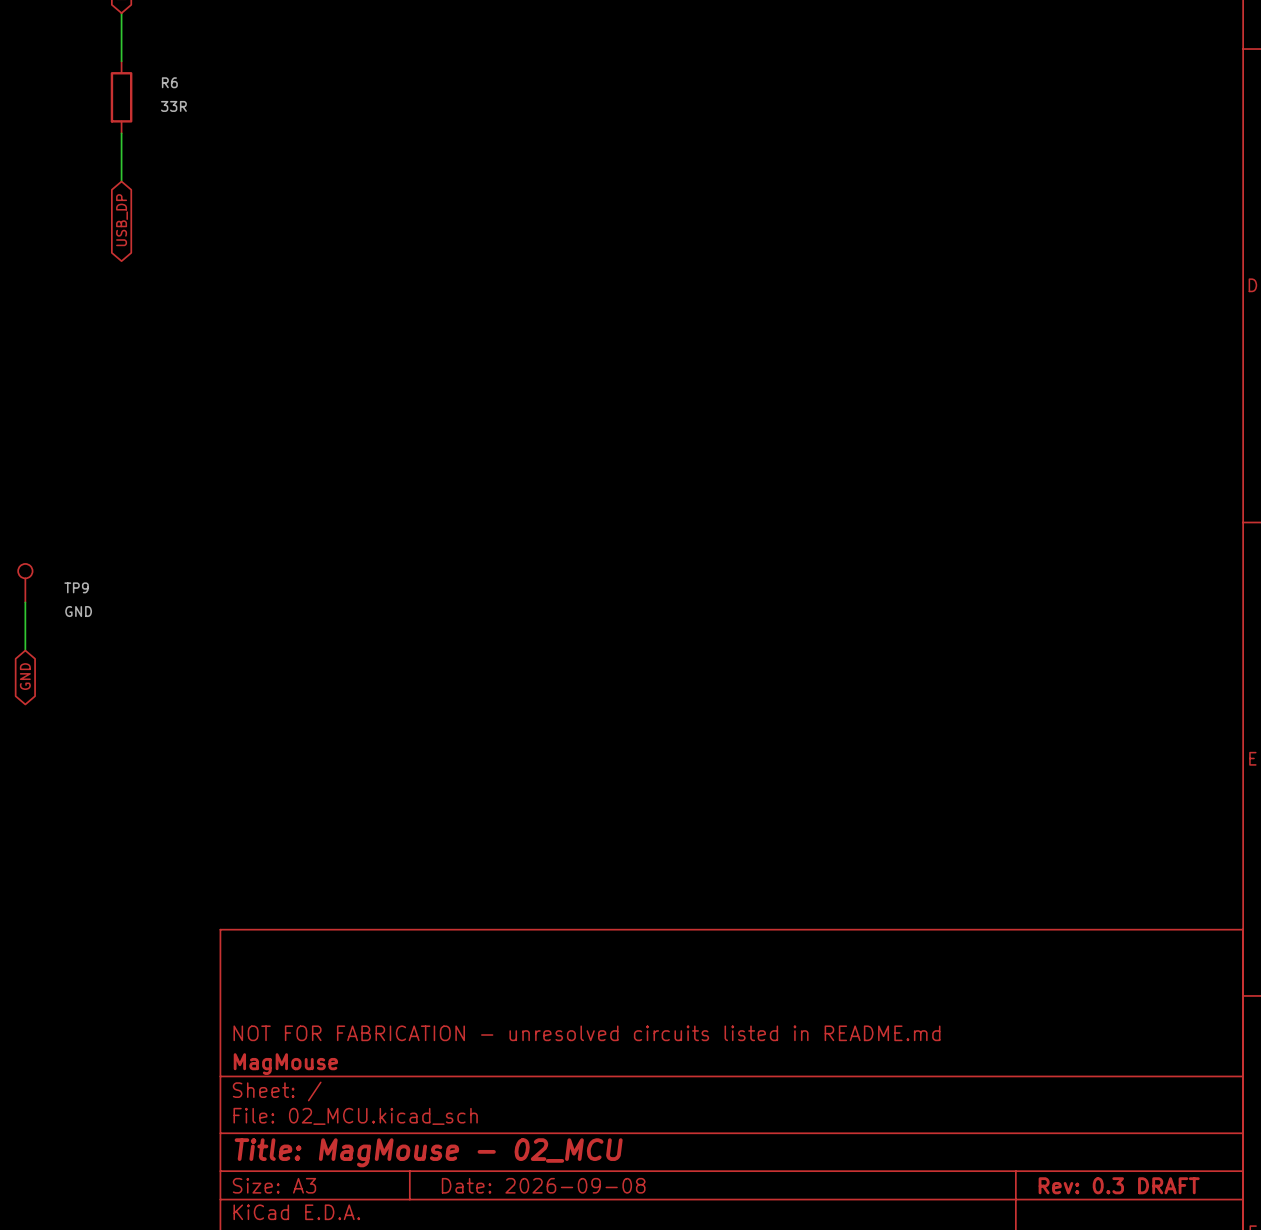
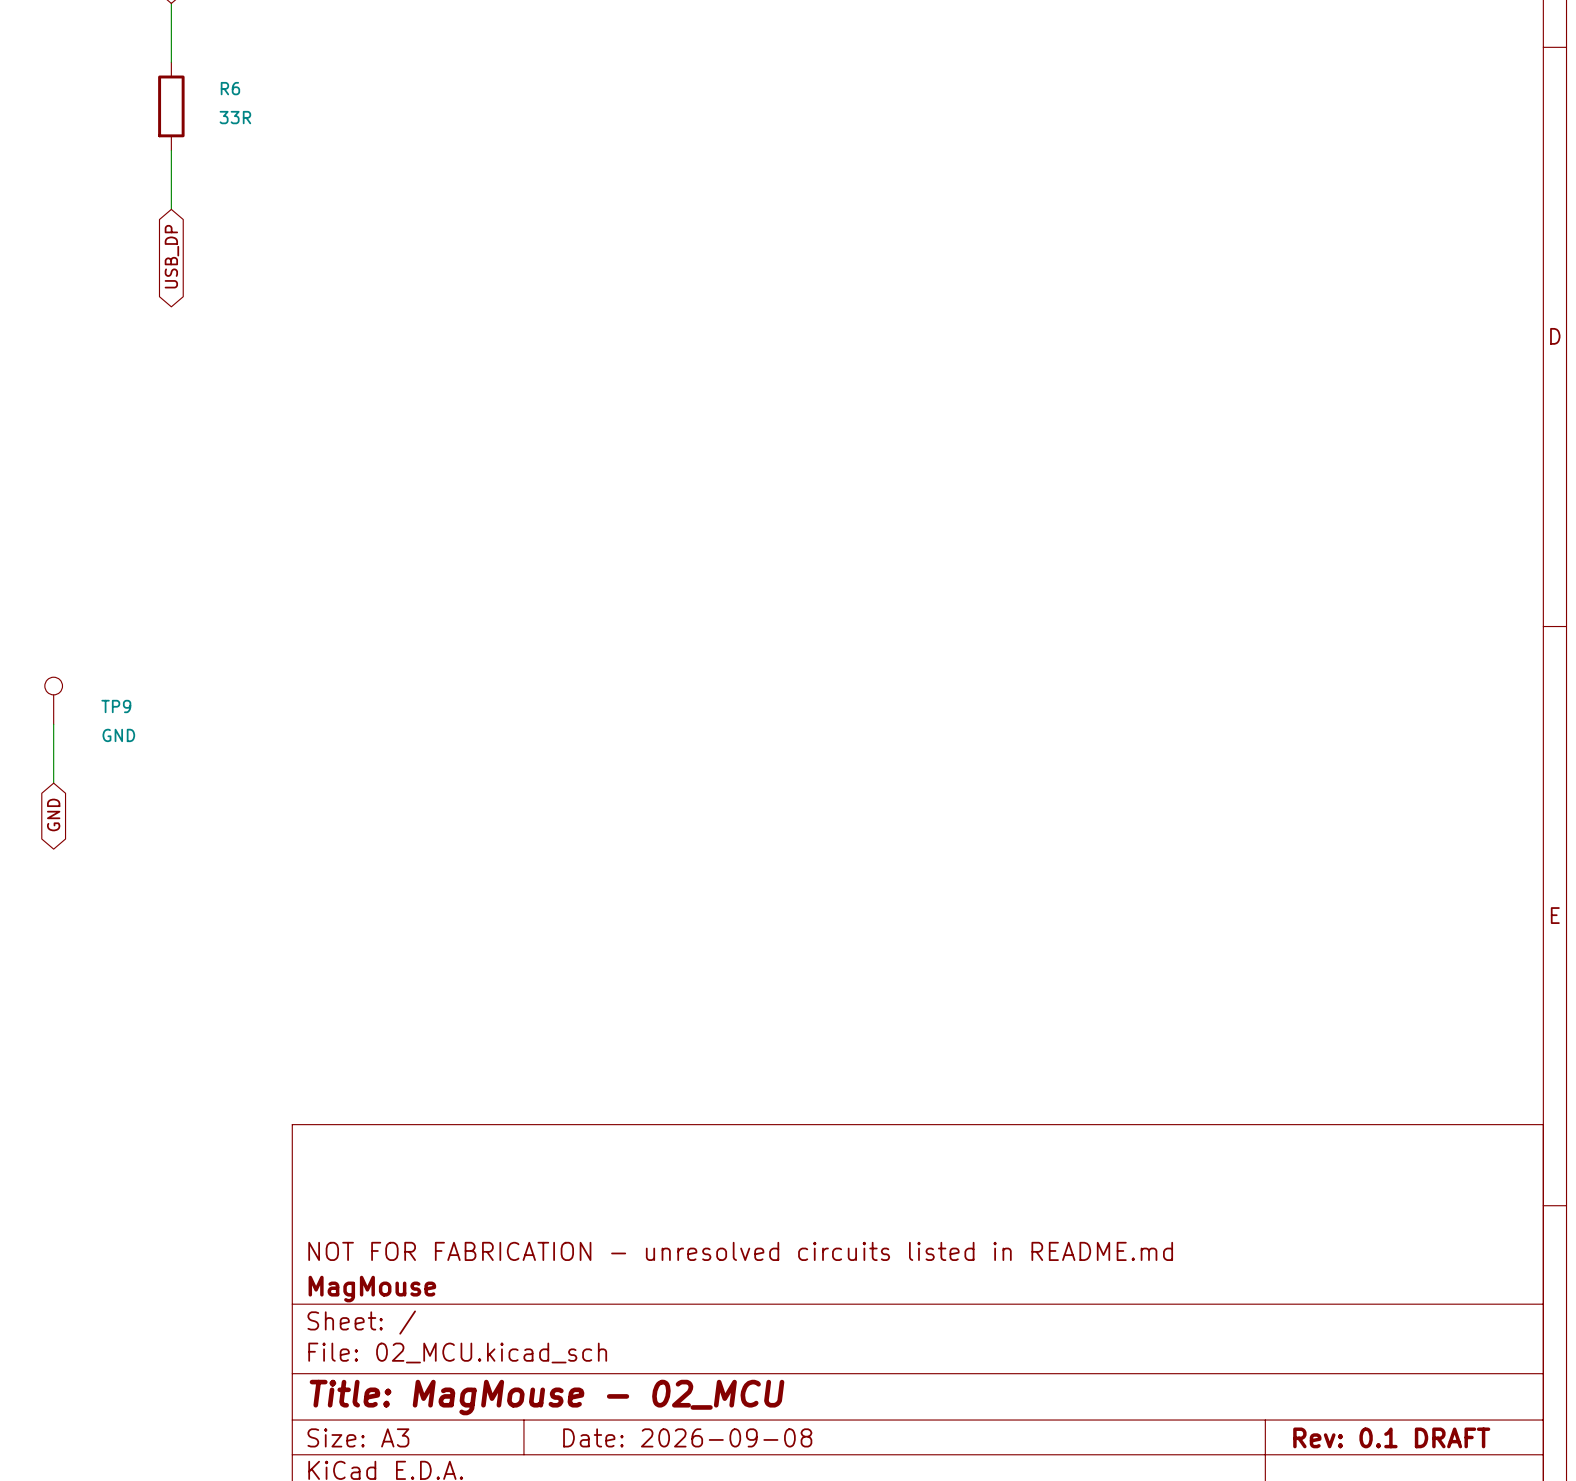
title block: Rev: 0.3 DRAFT (1119, 1185) -> Rev: 0.1 DRAFT (1391, 1437)

